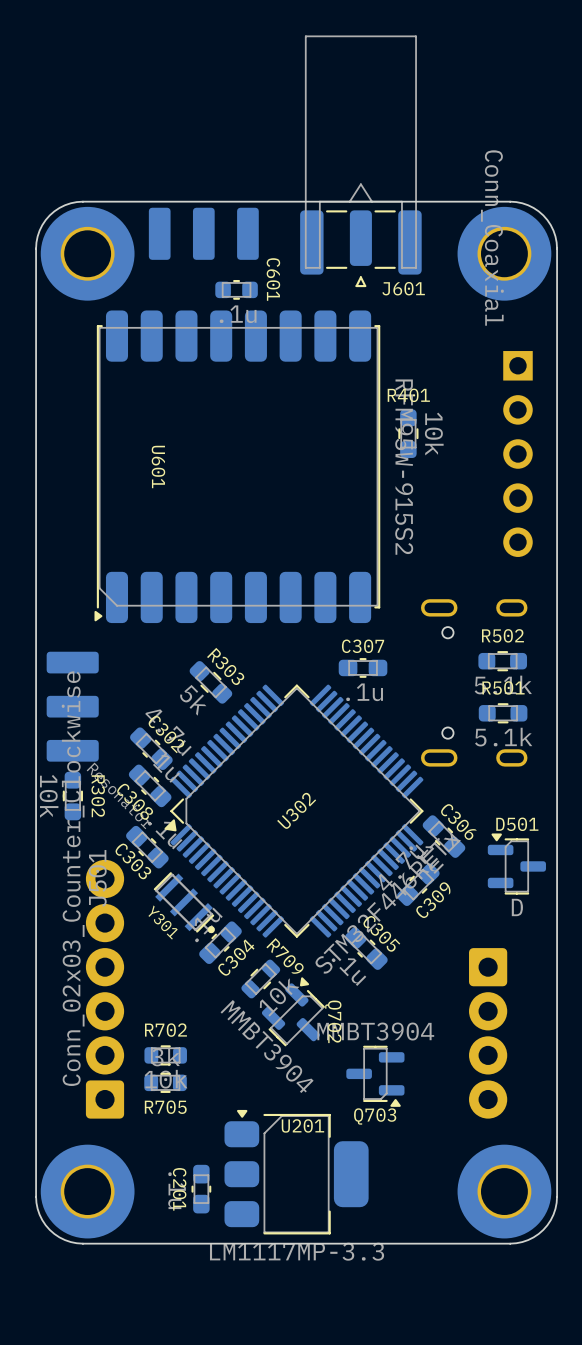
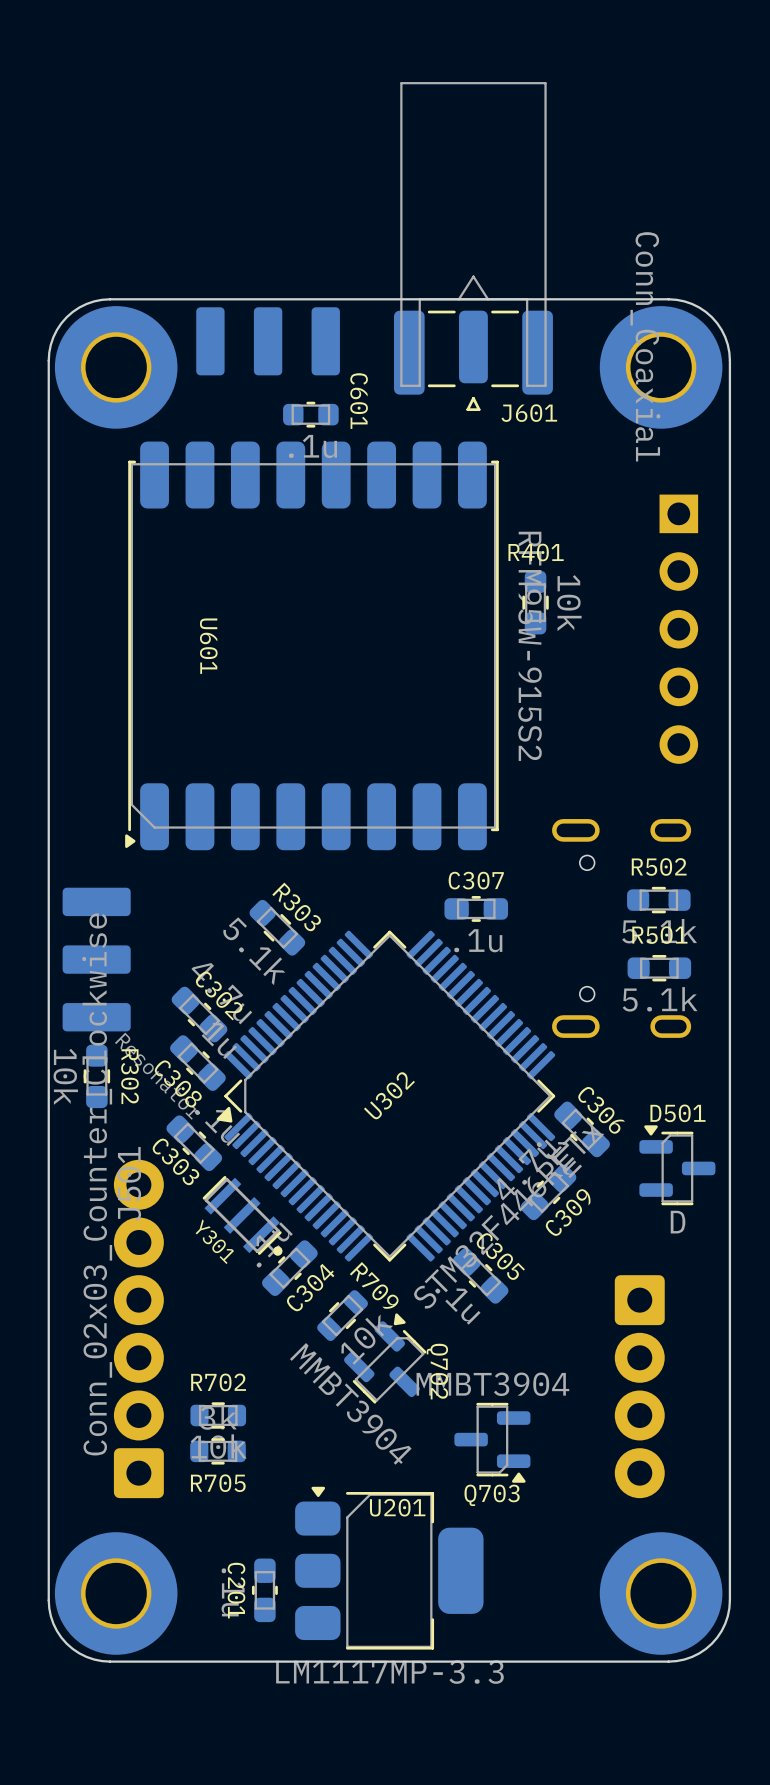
R303 value: 5k (193, 700) -> 5.1k (254, 951)

